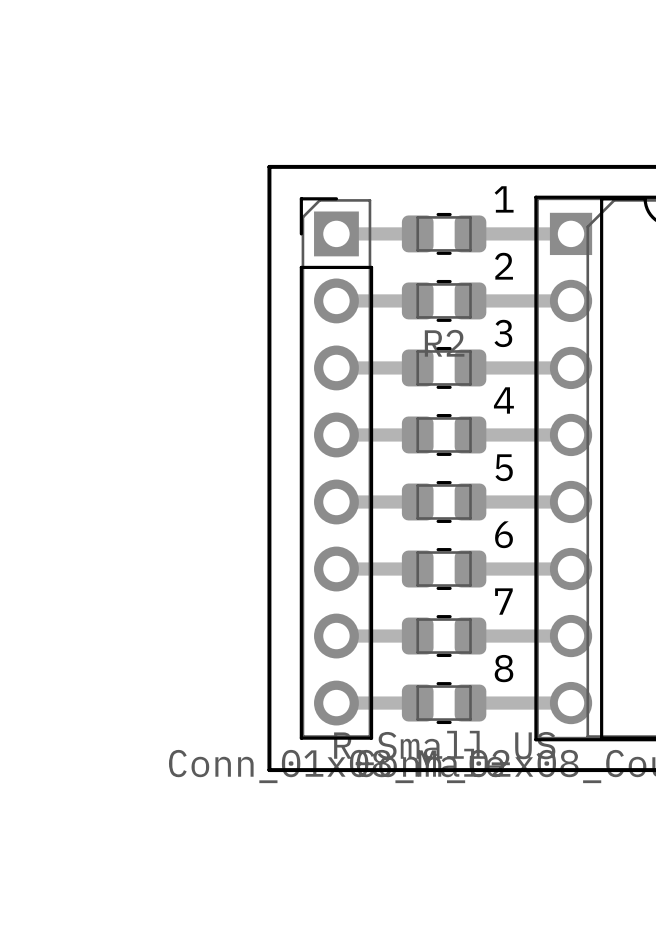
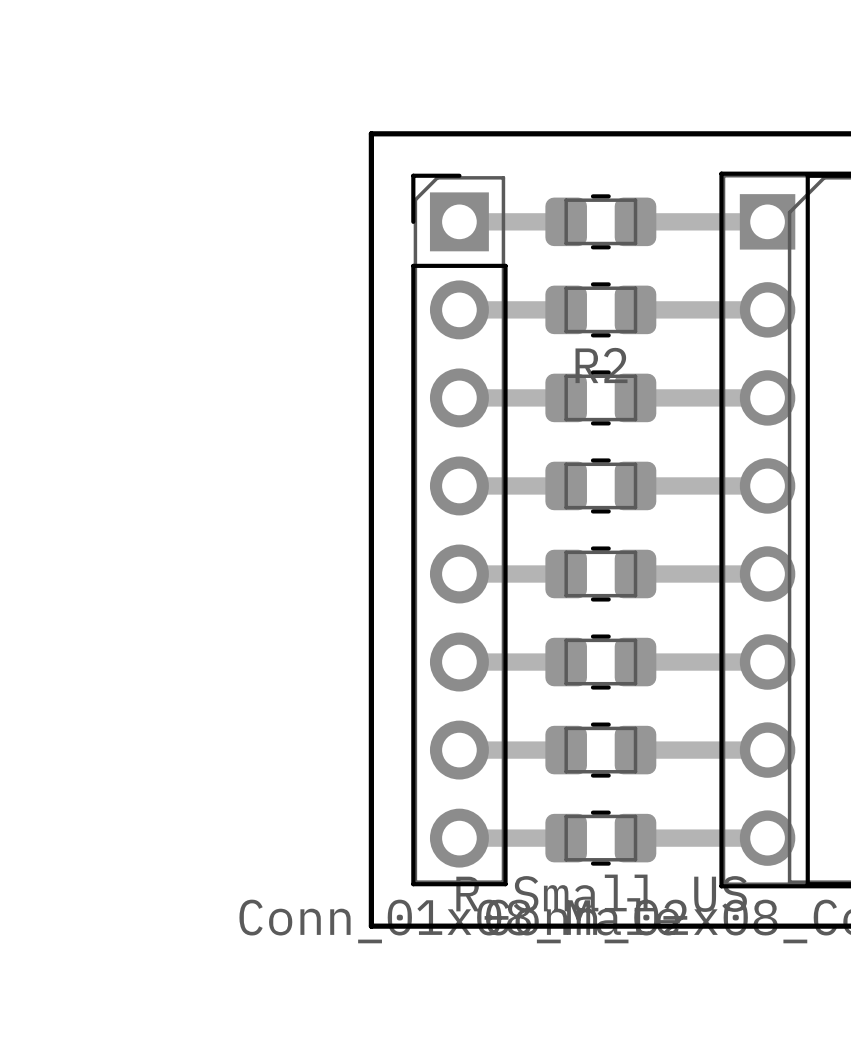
text: 1 (504, 199) -> none
text: 2 (504, 266) -> none
text: 3 (503, 333) -> none
text: 4 (503, 400) -> none
text: 5 (504, 467) -> none
text: 6 (504, 534) -> none
text: 7 (503, 601) -> none
text: 8 (504, 668) -> none

